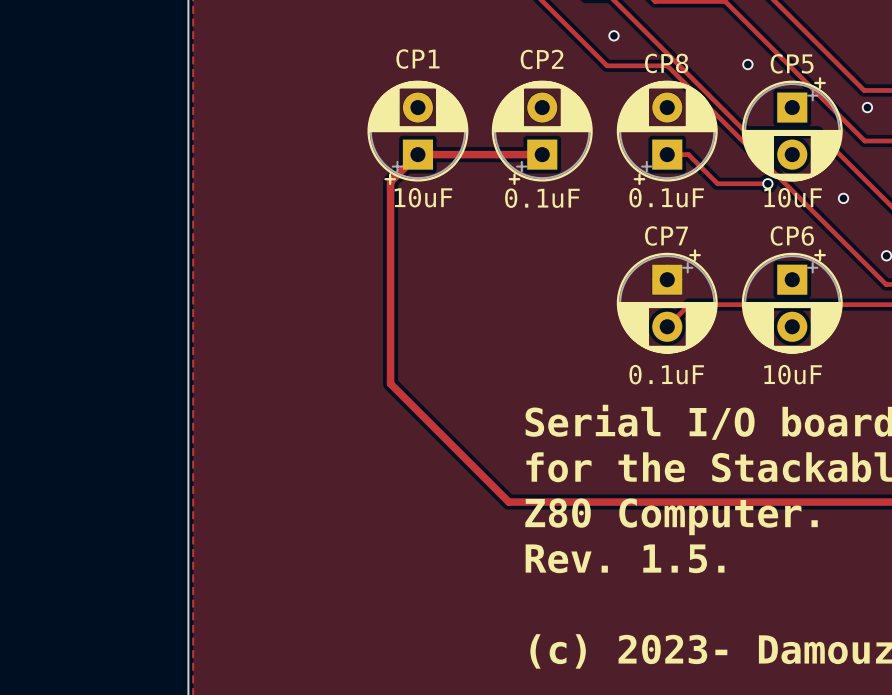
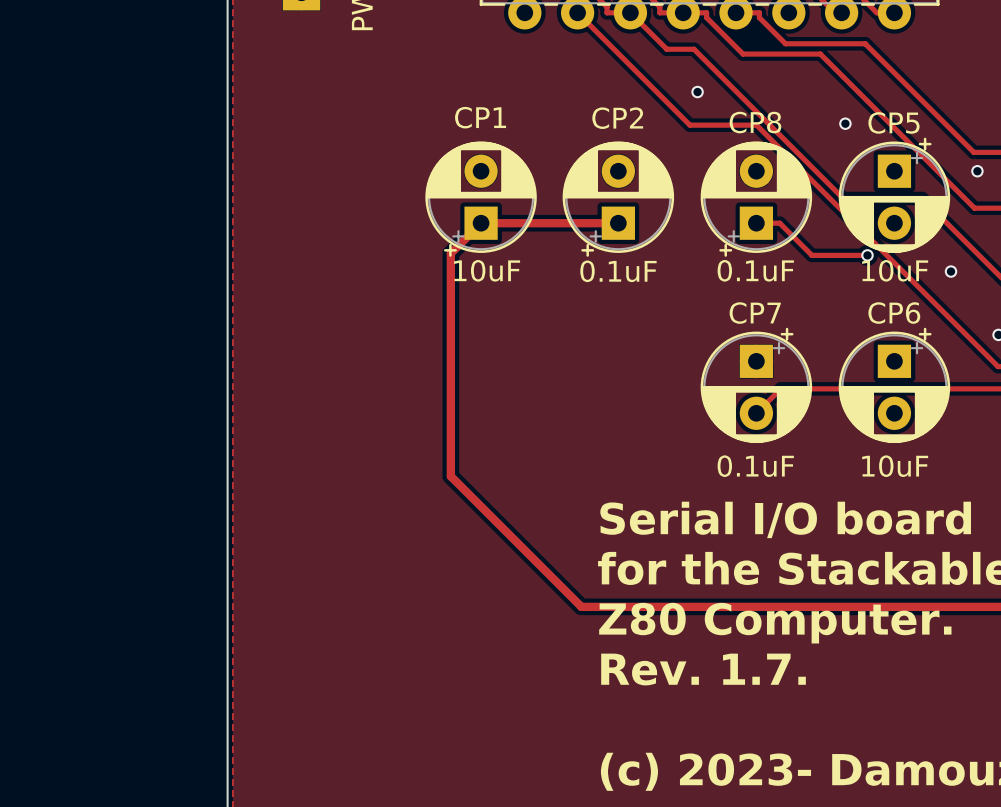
text: Rev. 1.5. (625, 558) -> Rev. 1.7. (703, 669)

